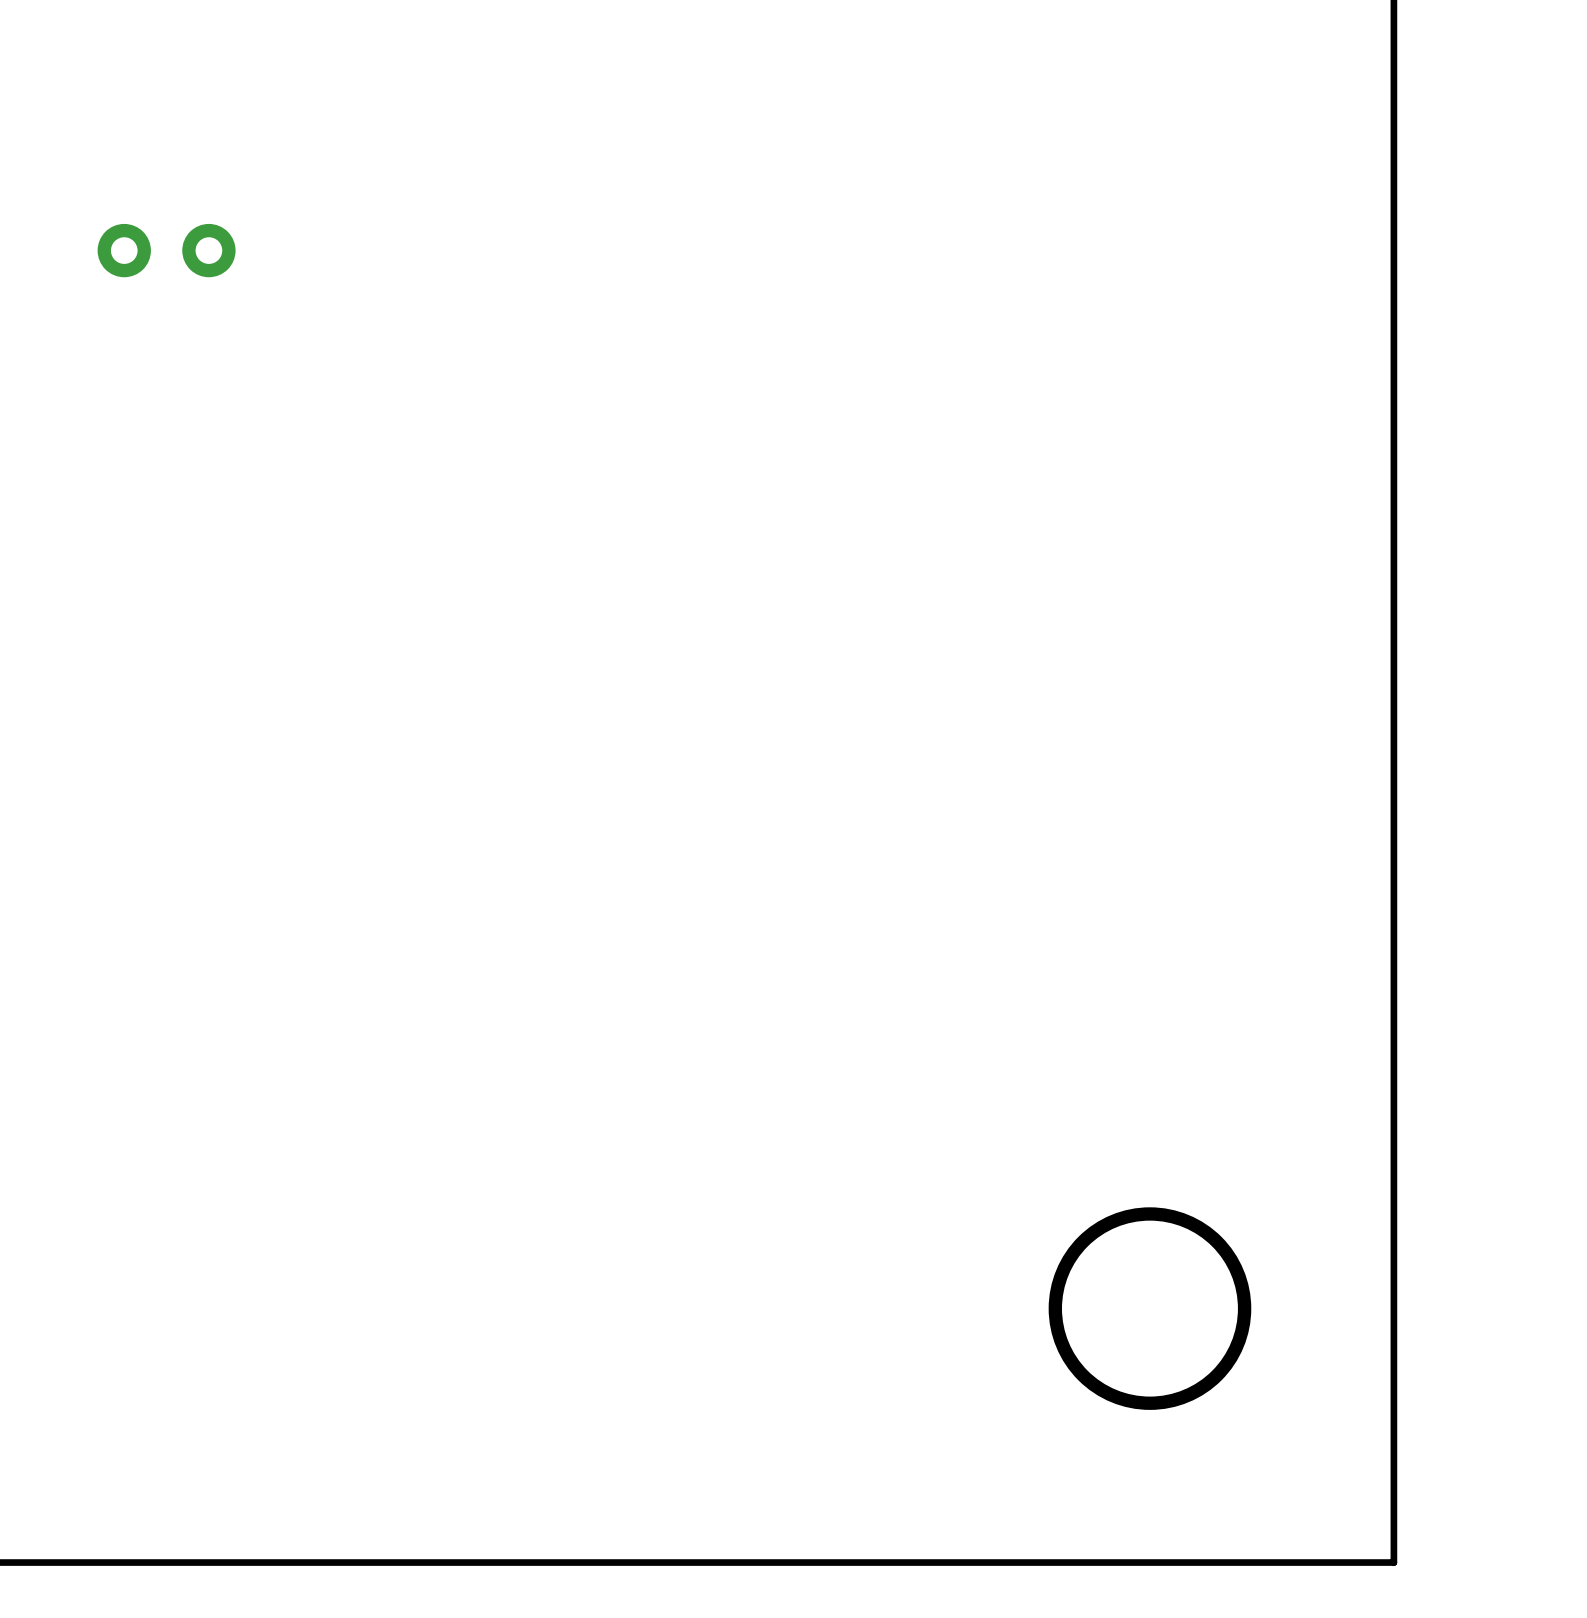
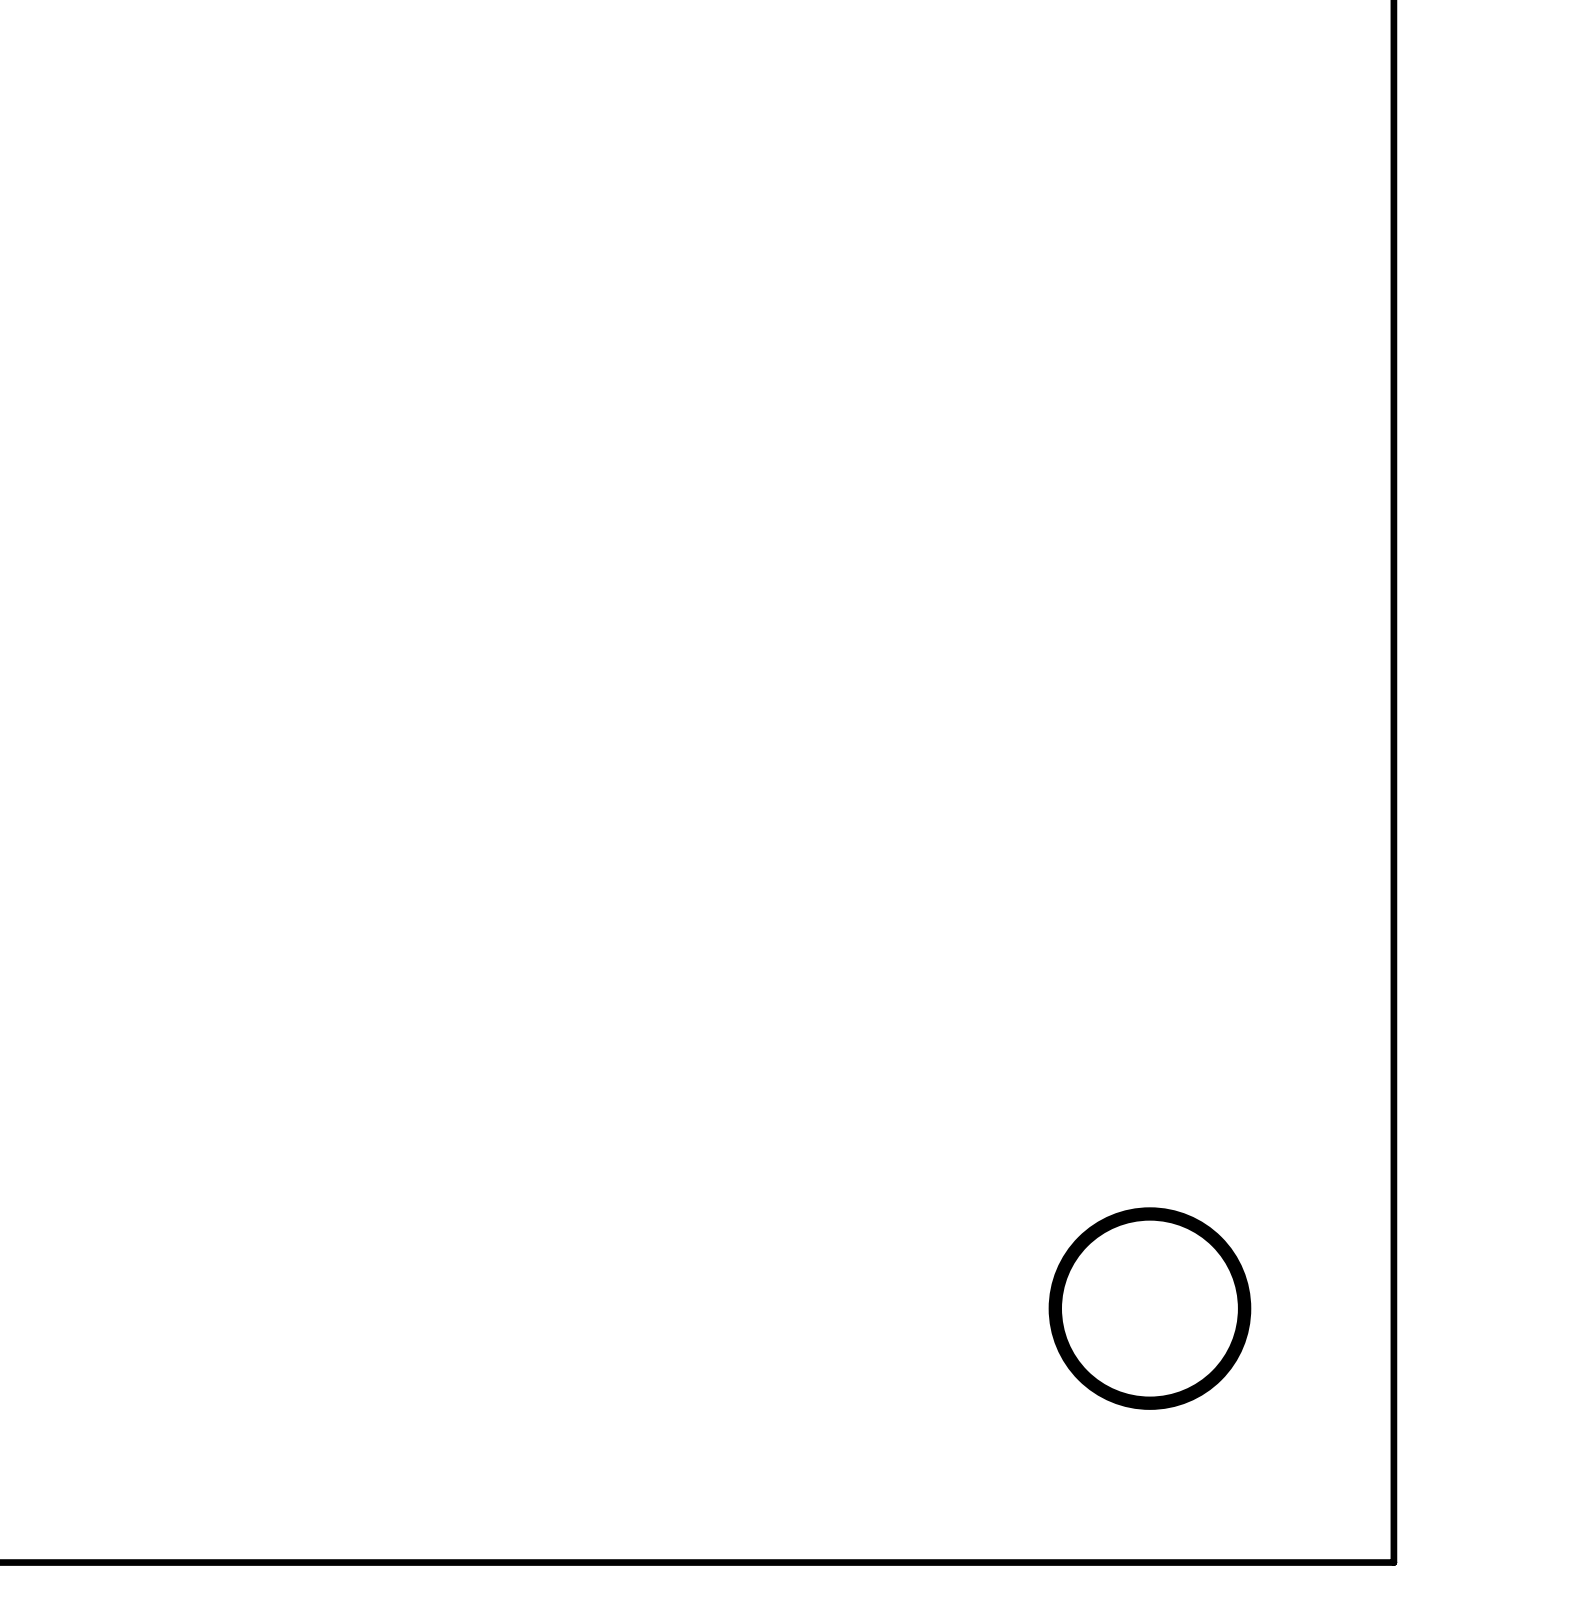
via: (124, 250) -> none
via: (208, 250) -> none

